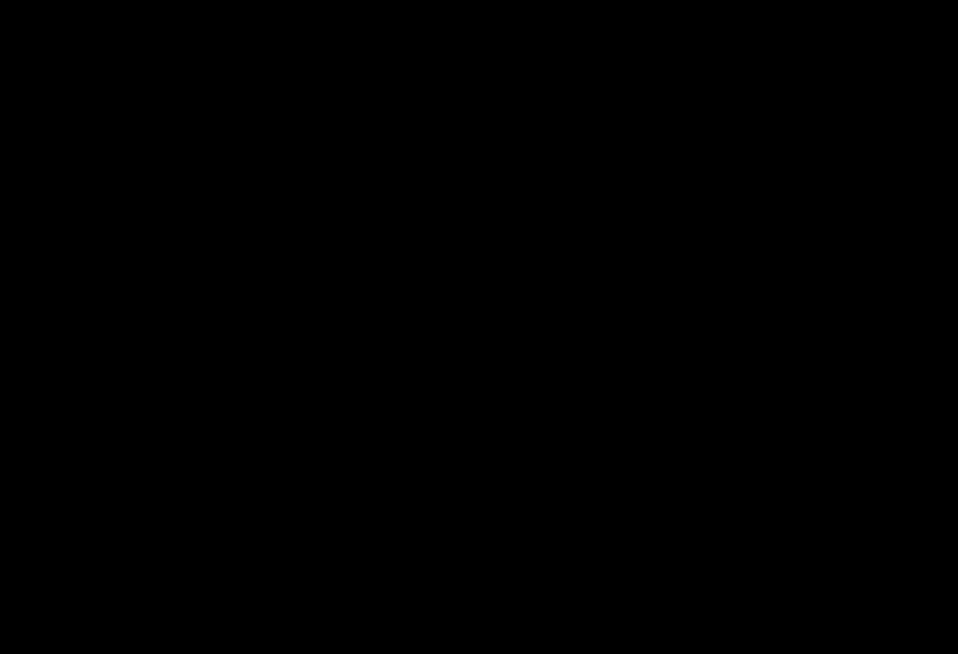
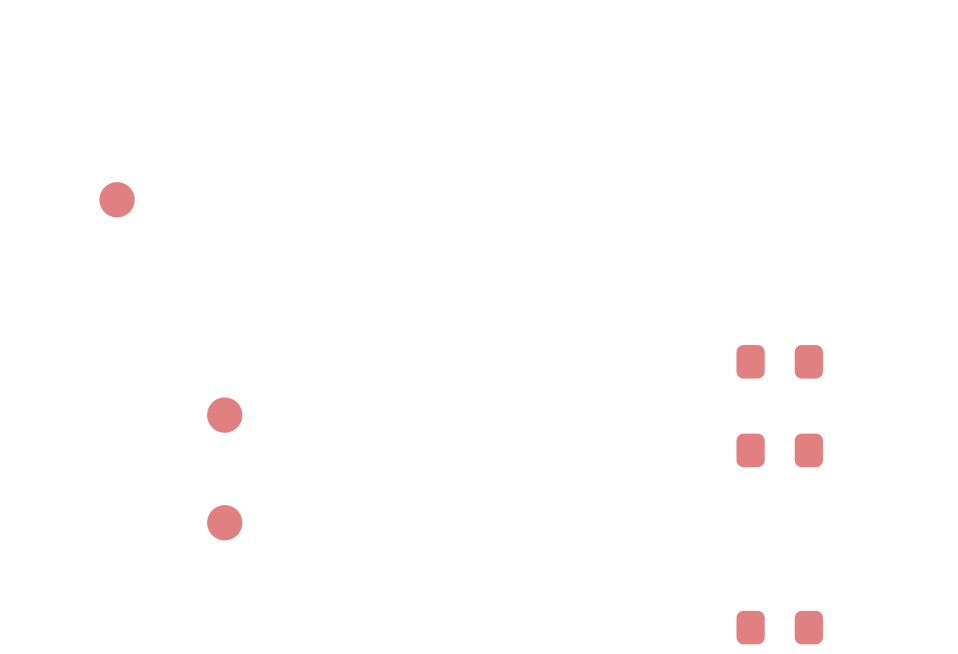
part: none -> (117, 199)
part: none -> (779, 361)
part: none -> (224, 415)
part: none -> (779, 450)
part: none -> (224, 522)
part: none -> (779, 627)

